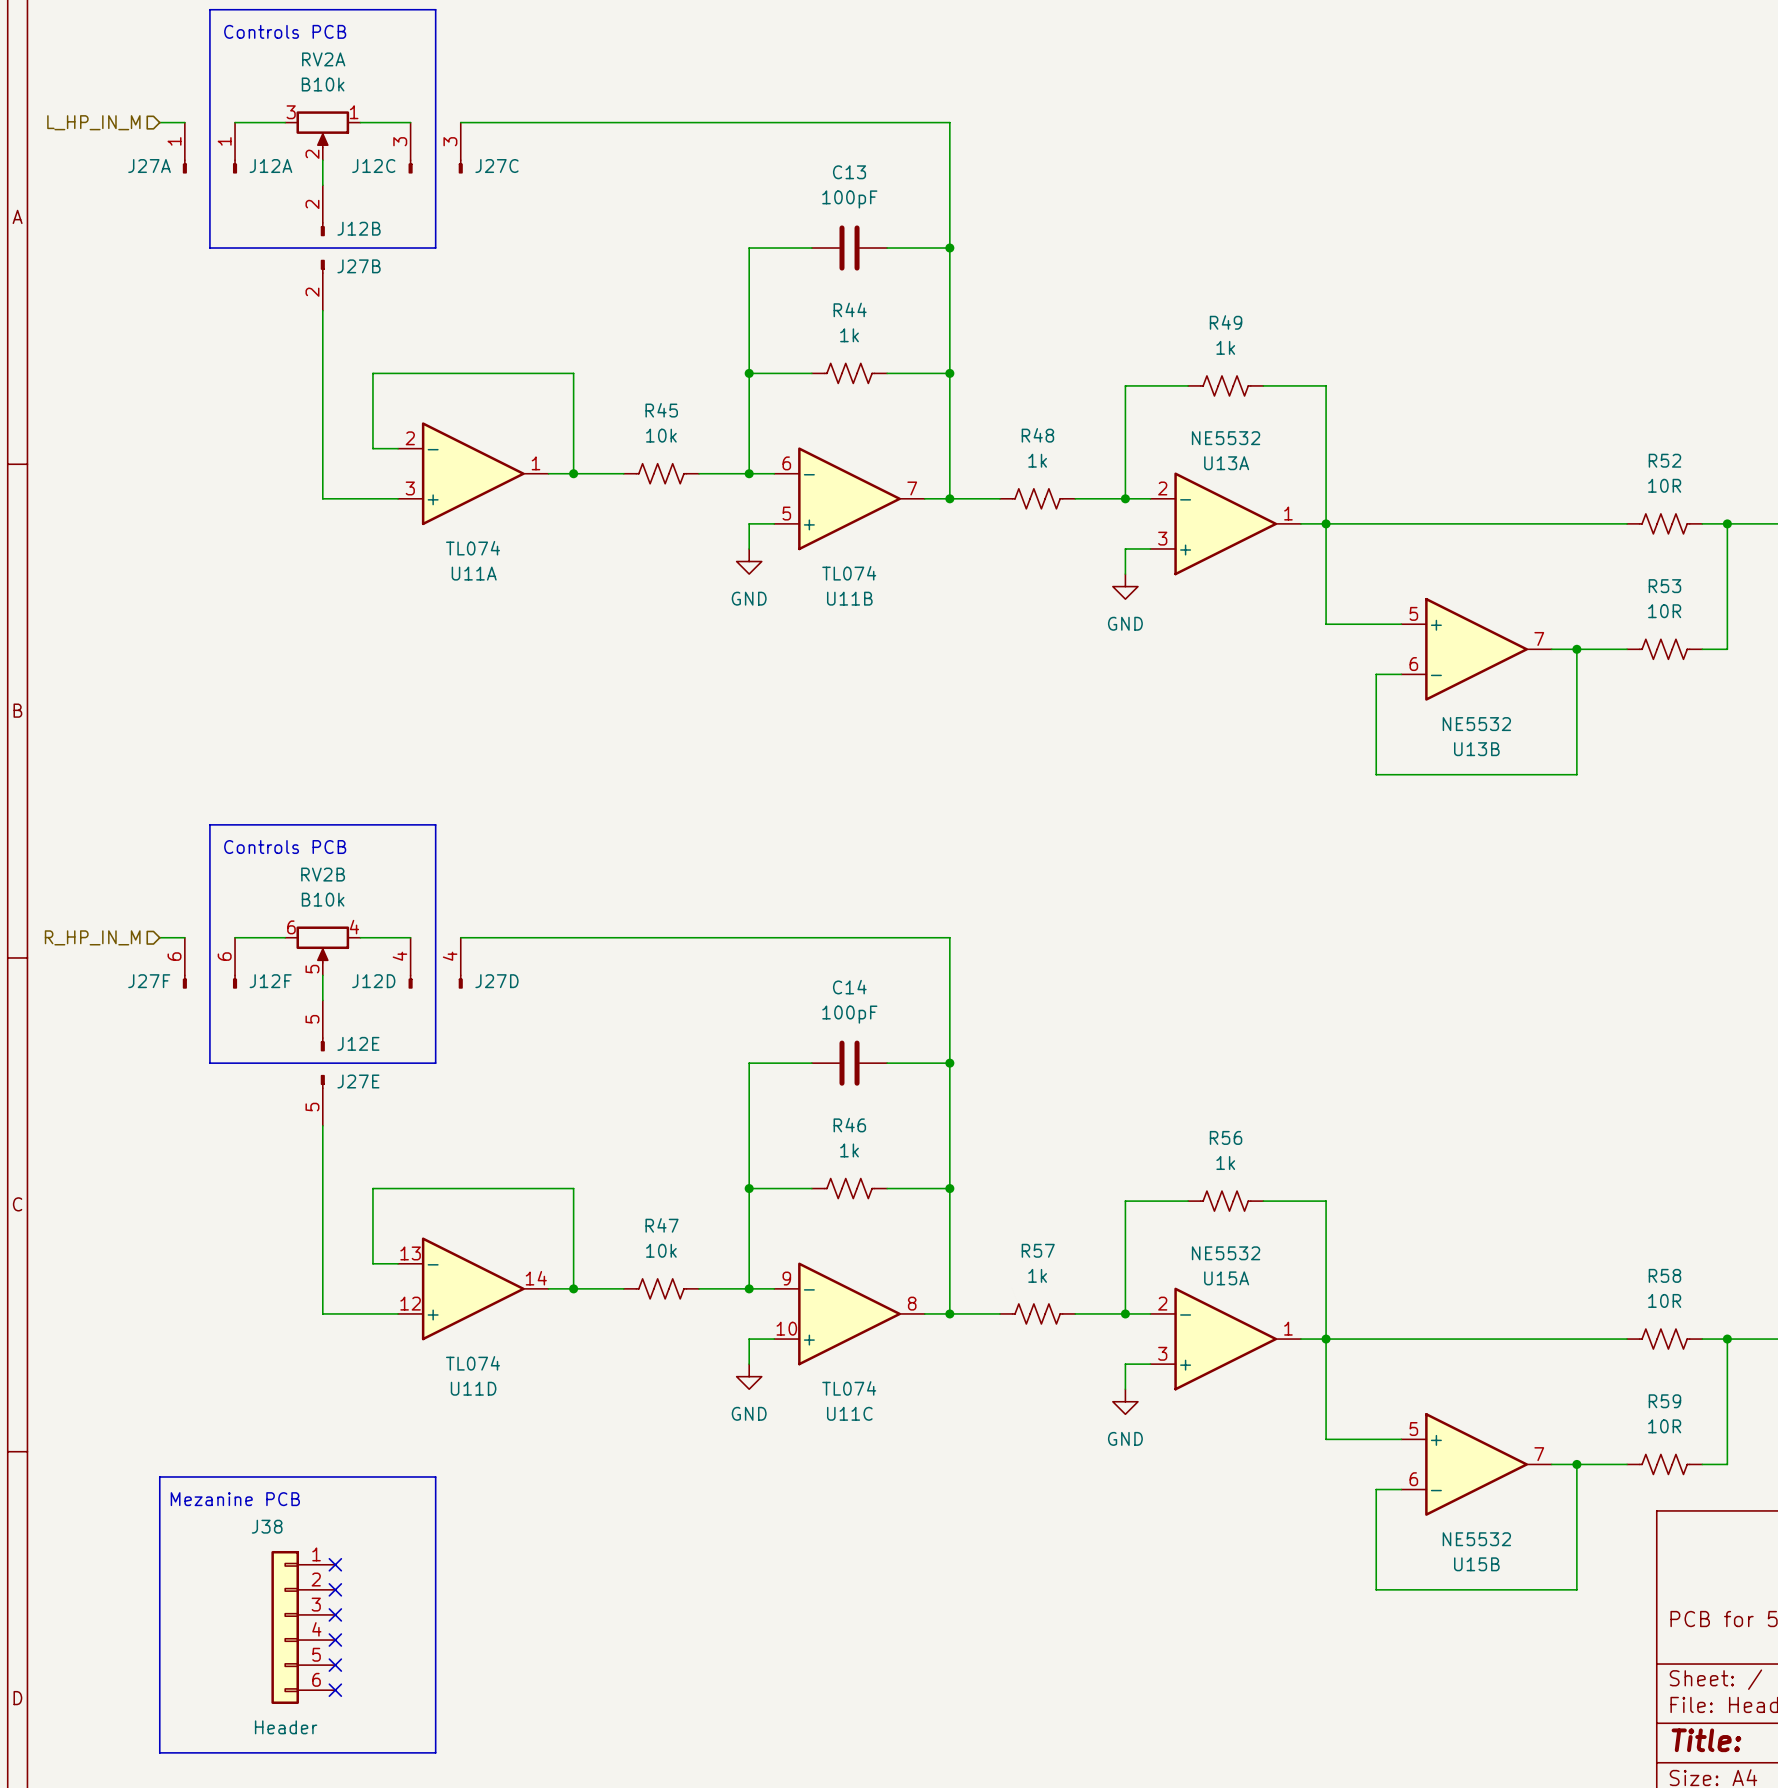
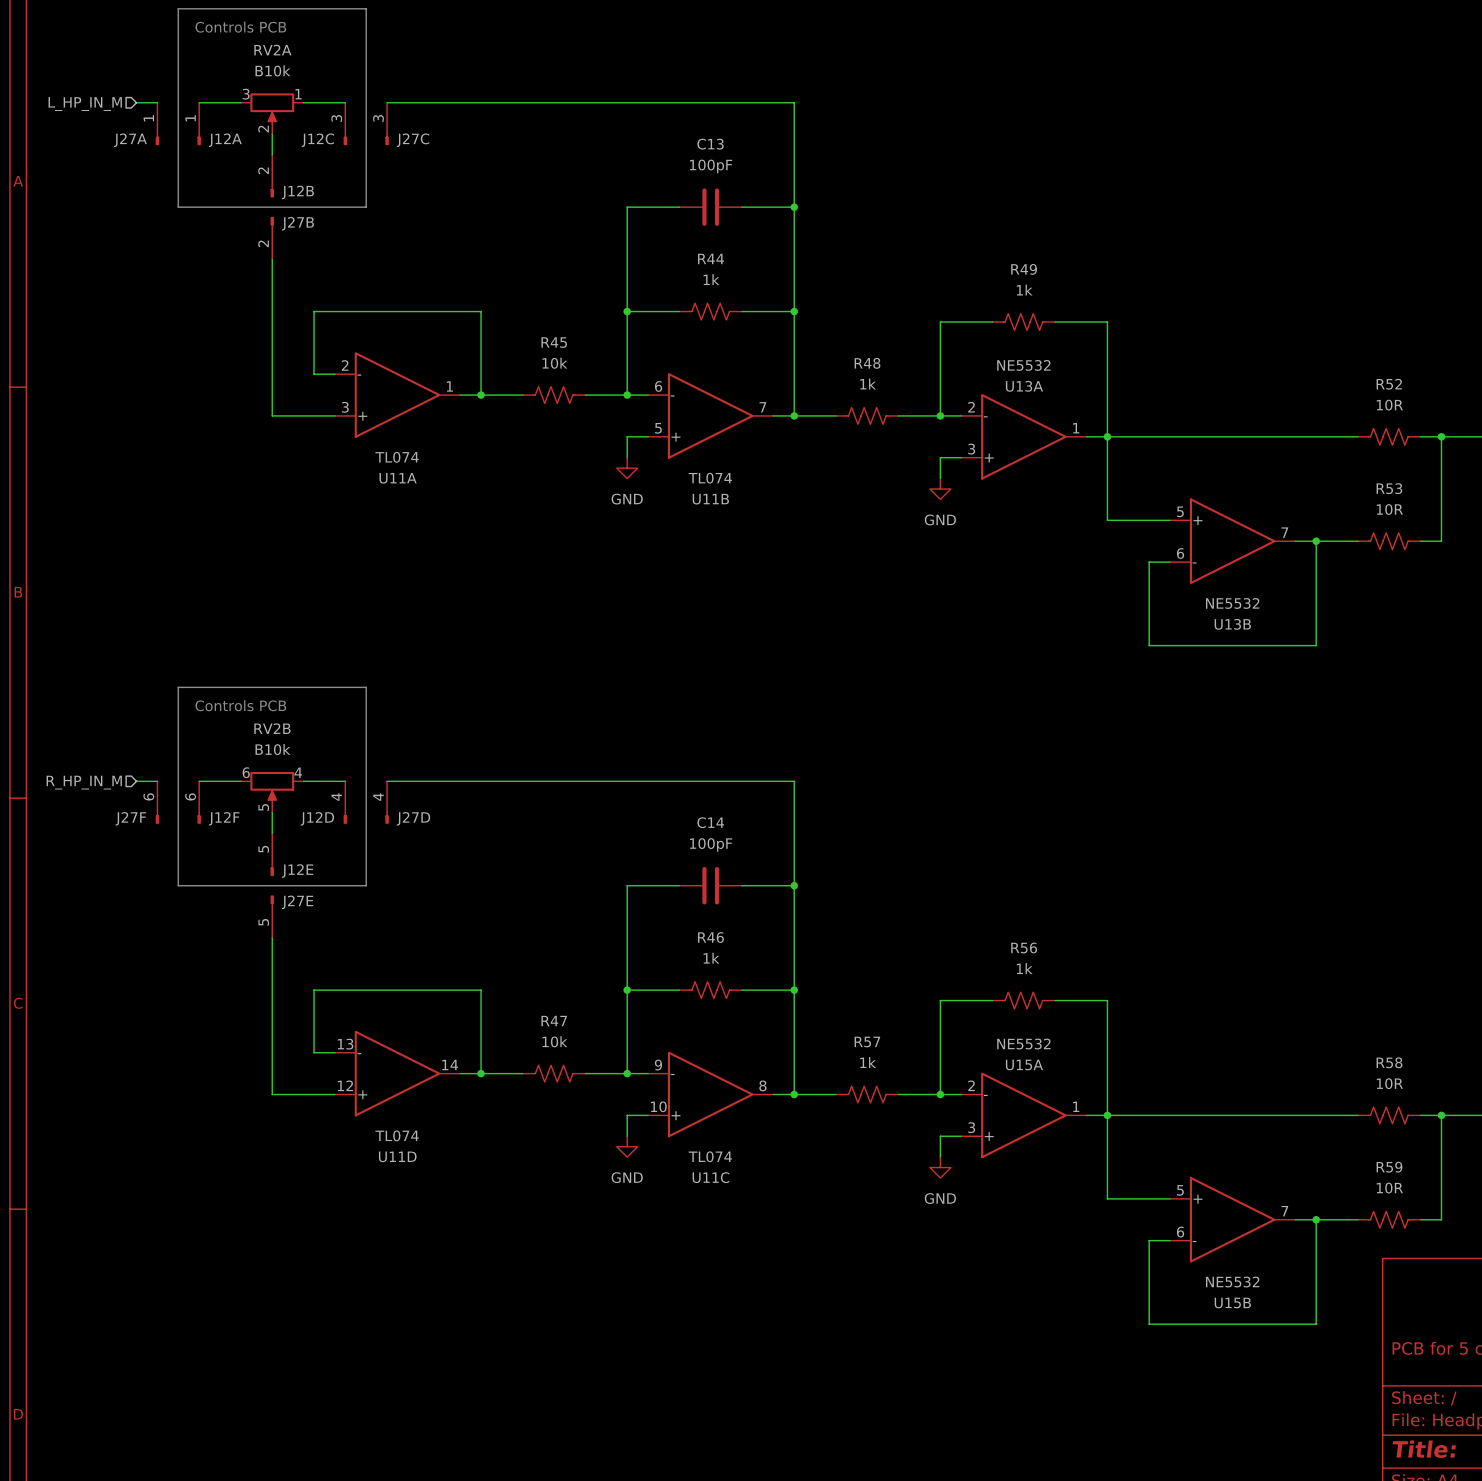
line: (159, 1476) (435, 1476) (435, 1752) (159, 1752) (159, 1476) -> none
text: Mezanine PCB (235, 1499) -> none
no-connect mark: (335, 1564) -> none
no-connect mark: (335, 1589) -> none
no-connect mark: (335, 1614) -> none
J38: (303, 1627) -> none
no-connect mark: (335, 1640) -> none
no-connect mark: (335, 1665) -> none
no-connect mark: (335, 1690) -> none

